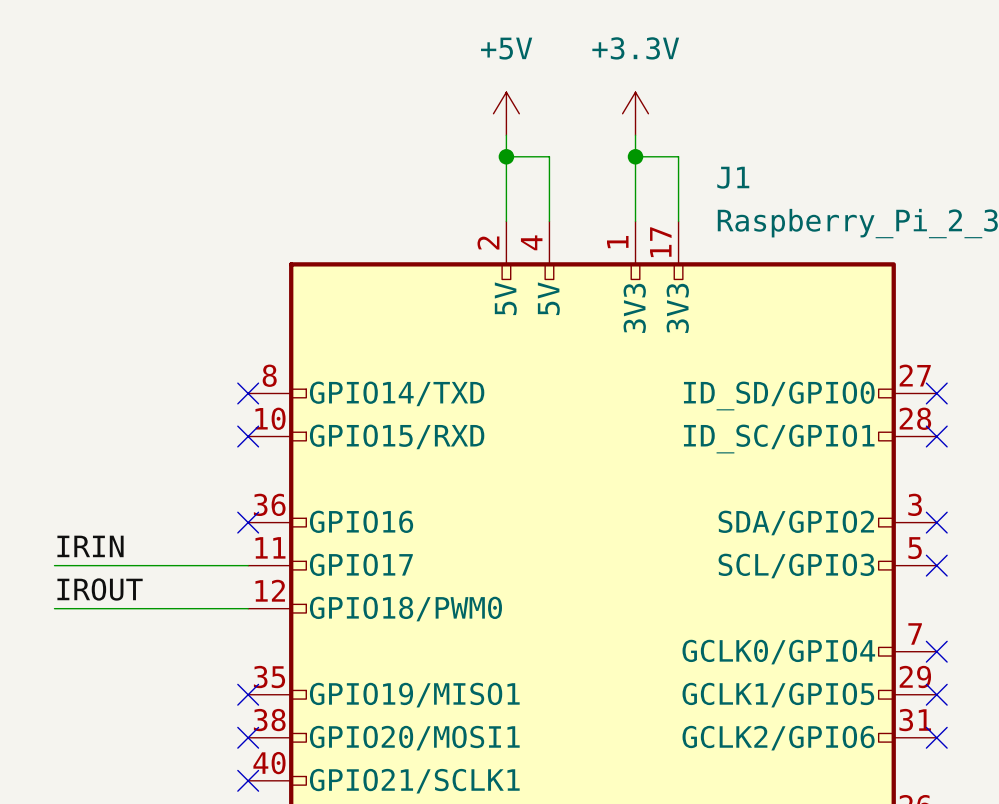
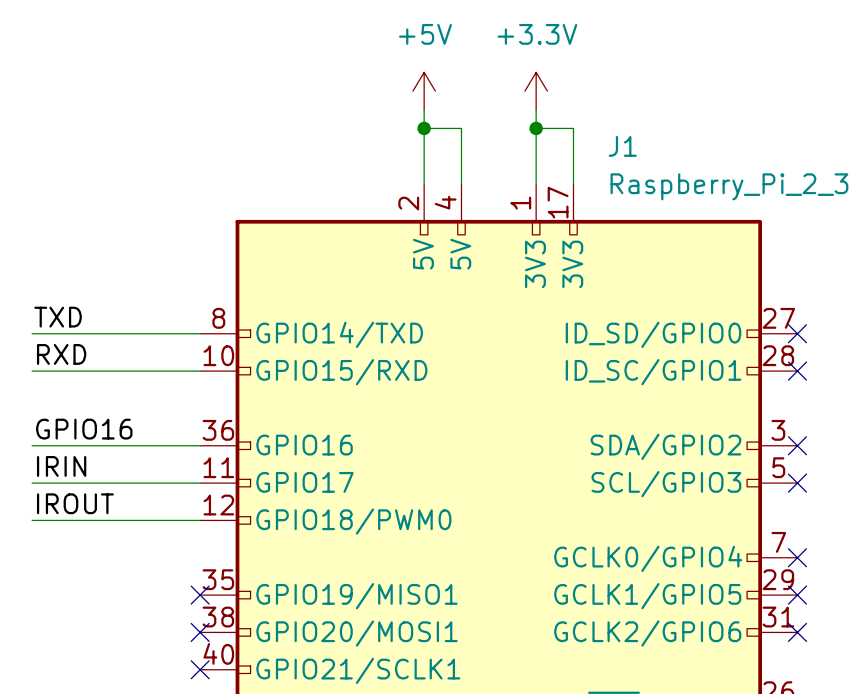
label: none -> TXD (58, 317)
wire: none -> (32, 333) (200, 333)
no-connect mark: (248, 393) -> none
label: none -> RXD (61, 354)
wire: none -> (32, 371) (200, 371)
no-connect mark: (248, 436) -> none
label: none -> GPIO16 (84, 429)
wire: none -> (32, 445) (200, 445)
no-connect mark: (248, 522) -> none

